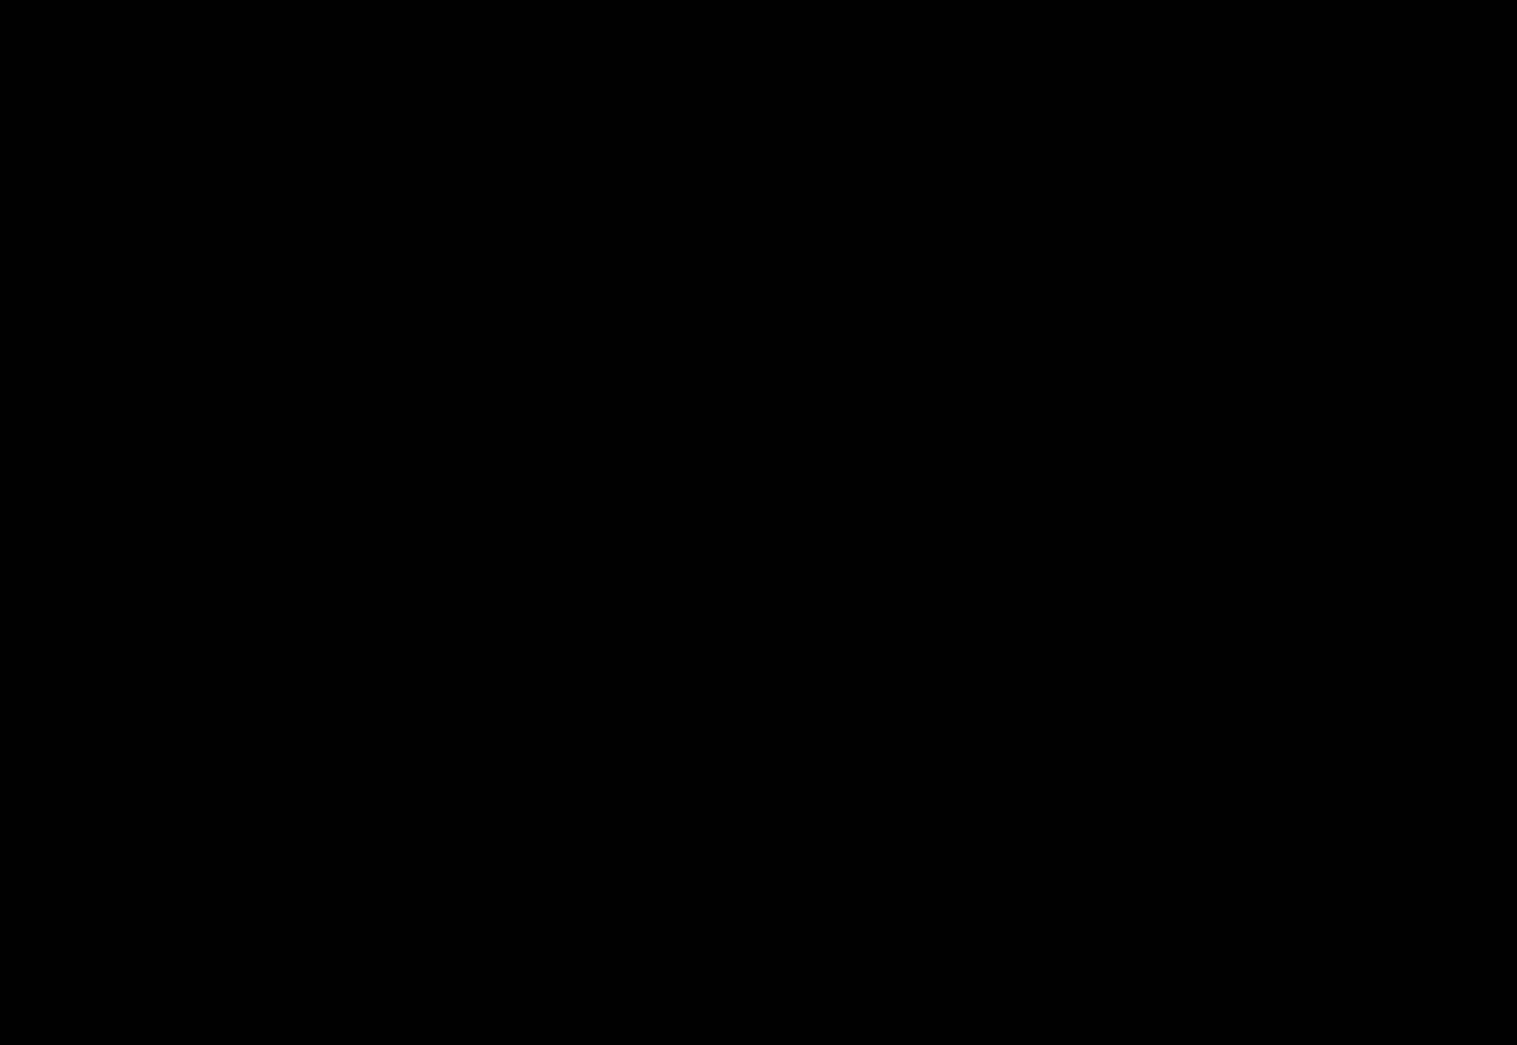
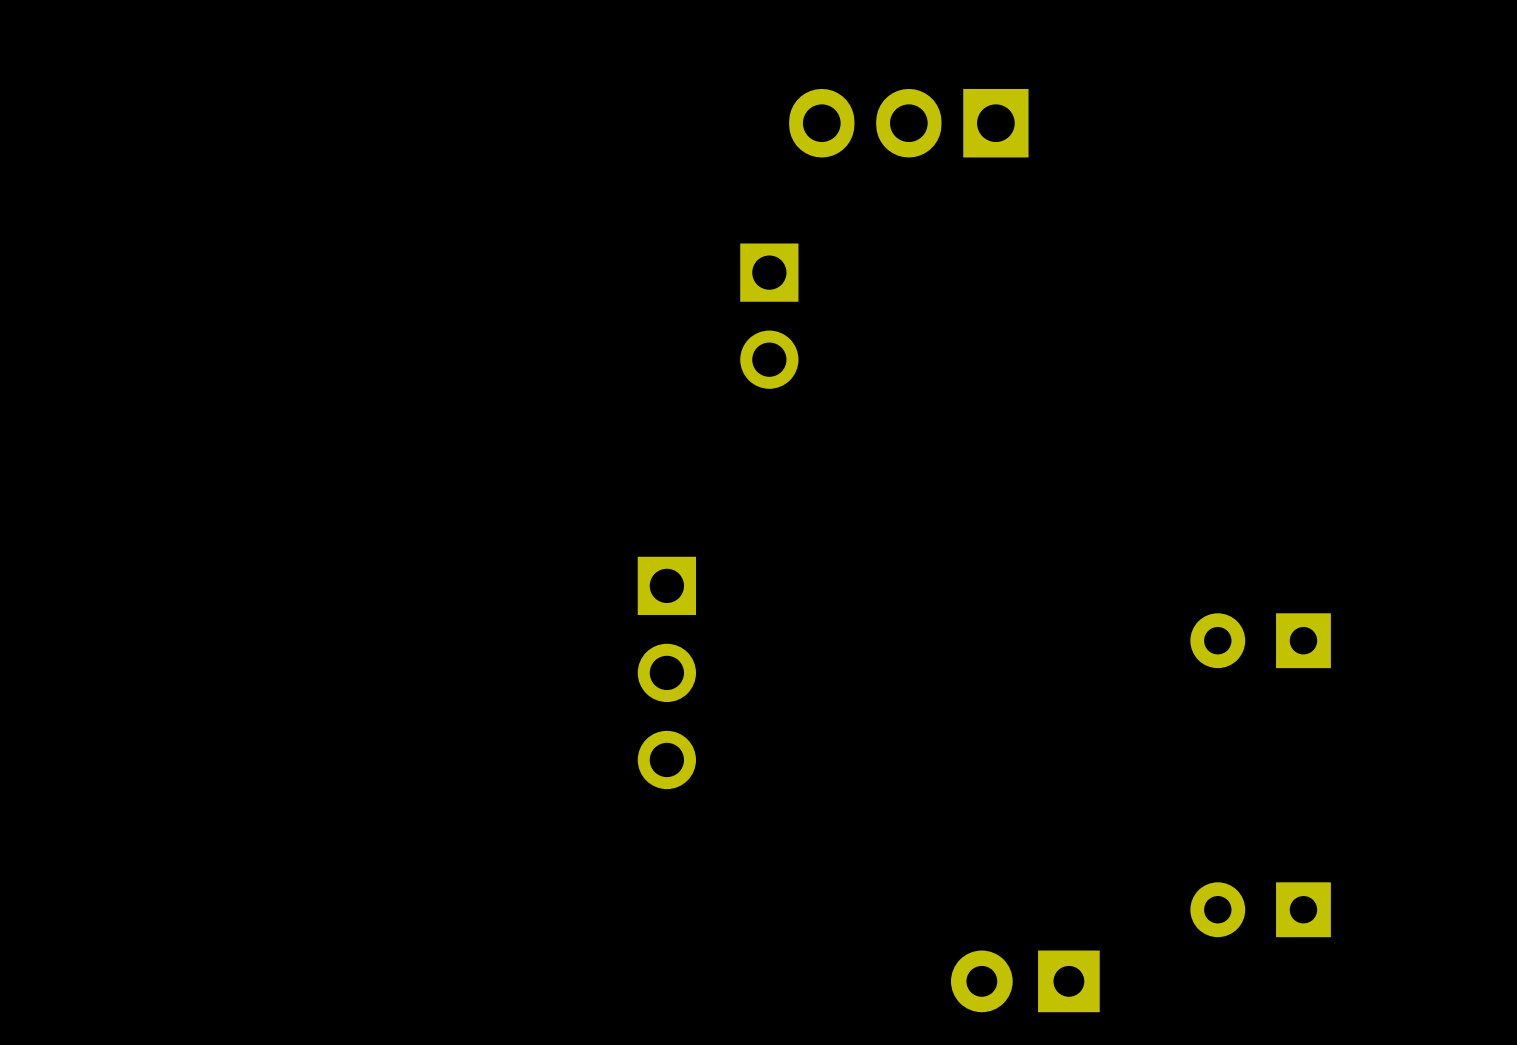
part: none -> (908, 123)
part: none -> (769, 316)
part: none -> (1260, 640)
part: none -> (666, 672)
part: none -> (1260, 909)
part: none -> (1025, 981)

